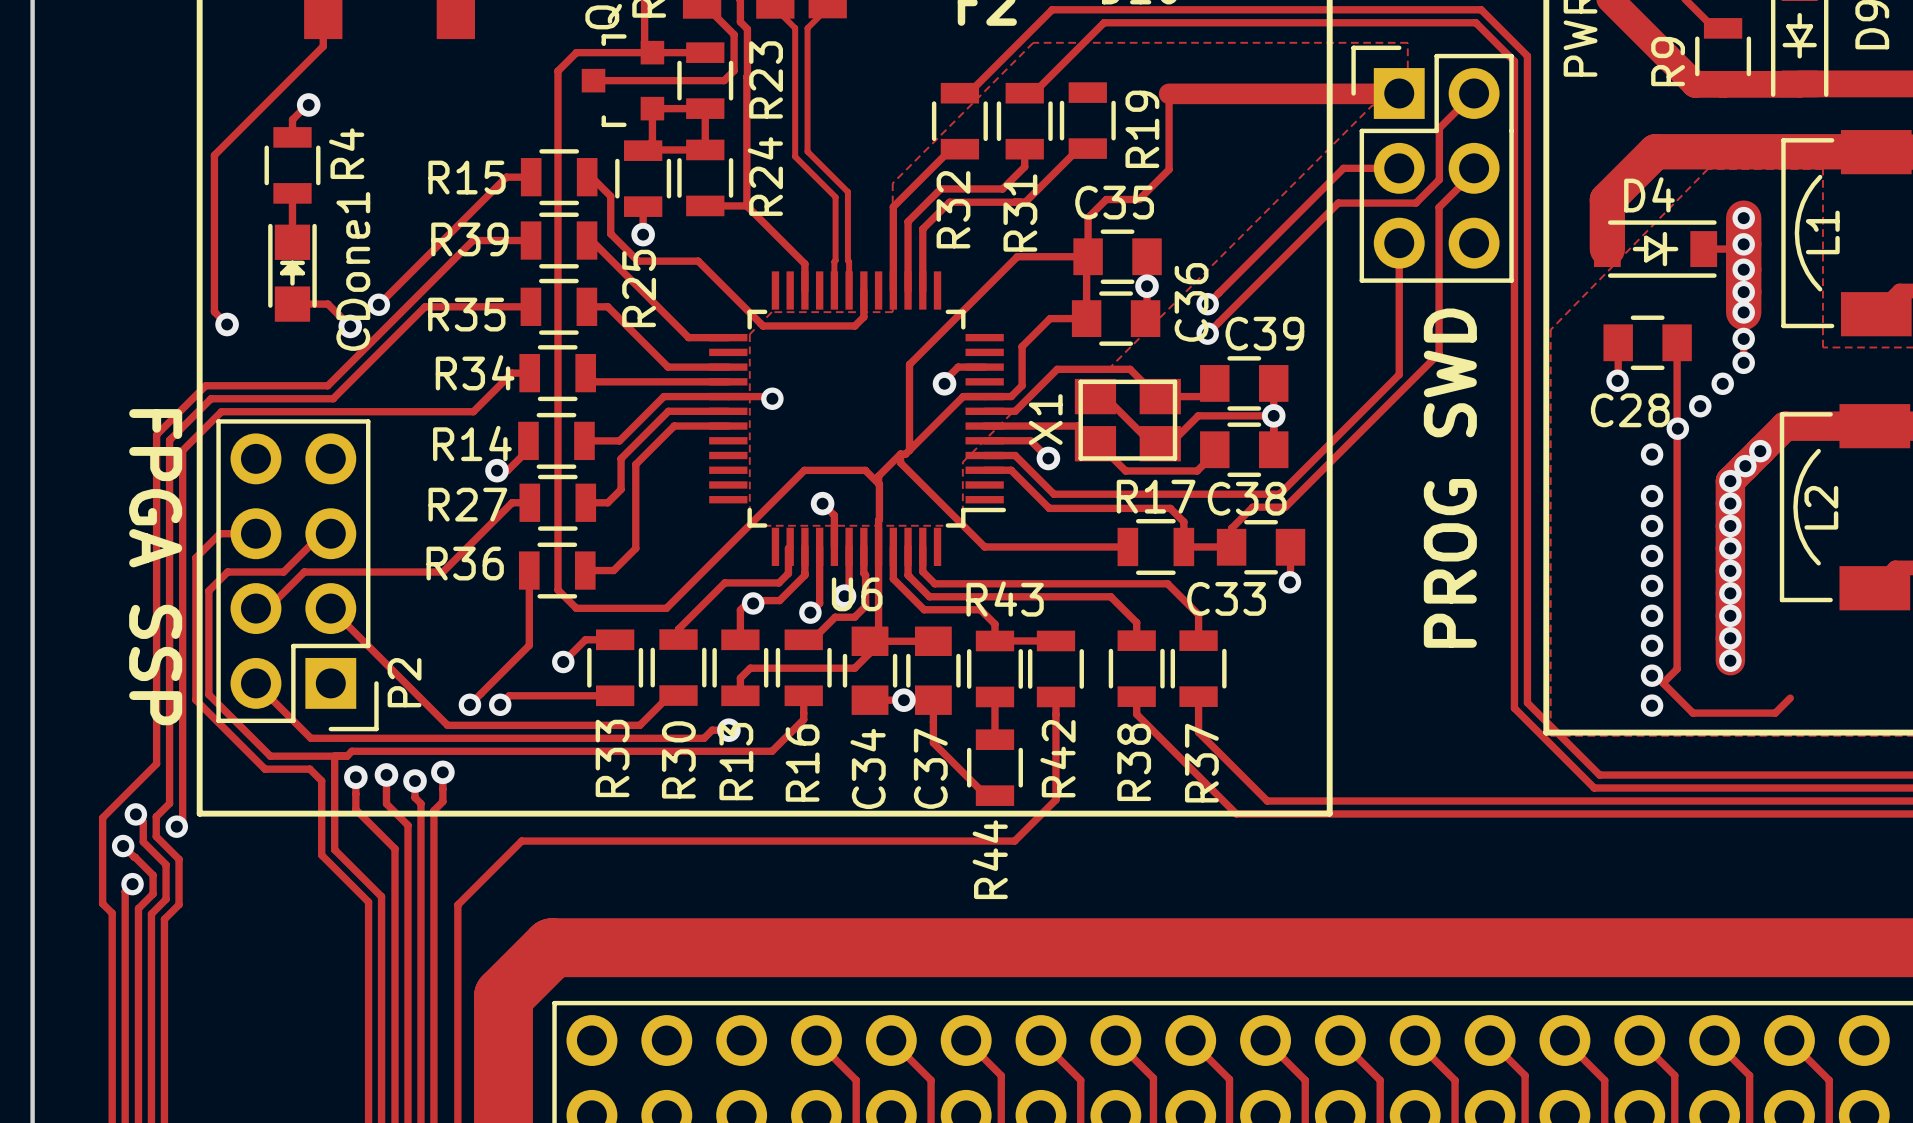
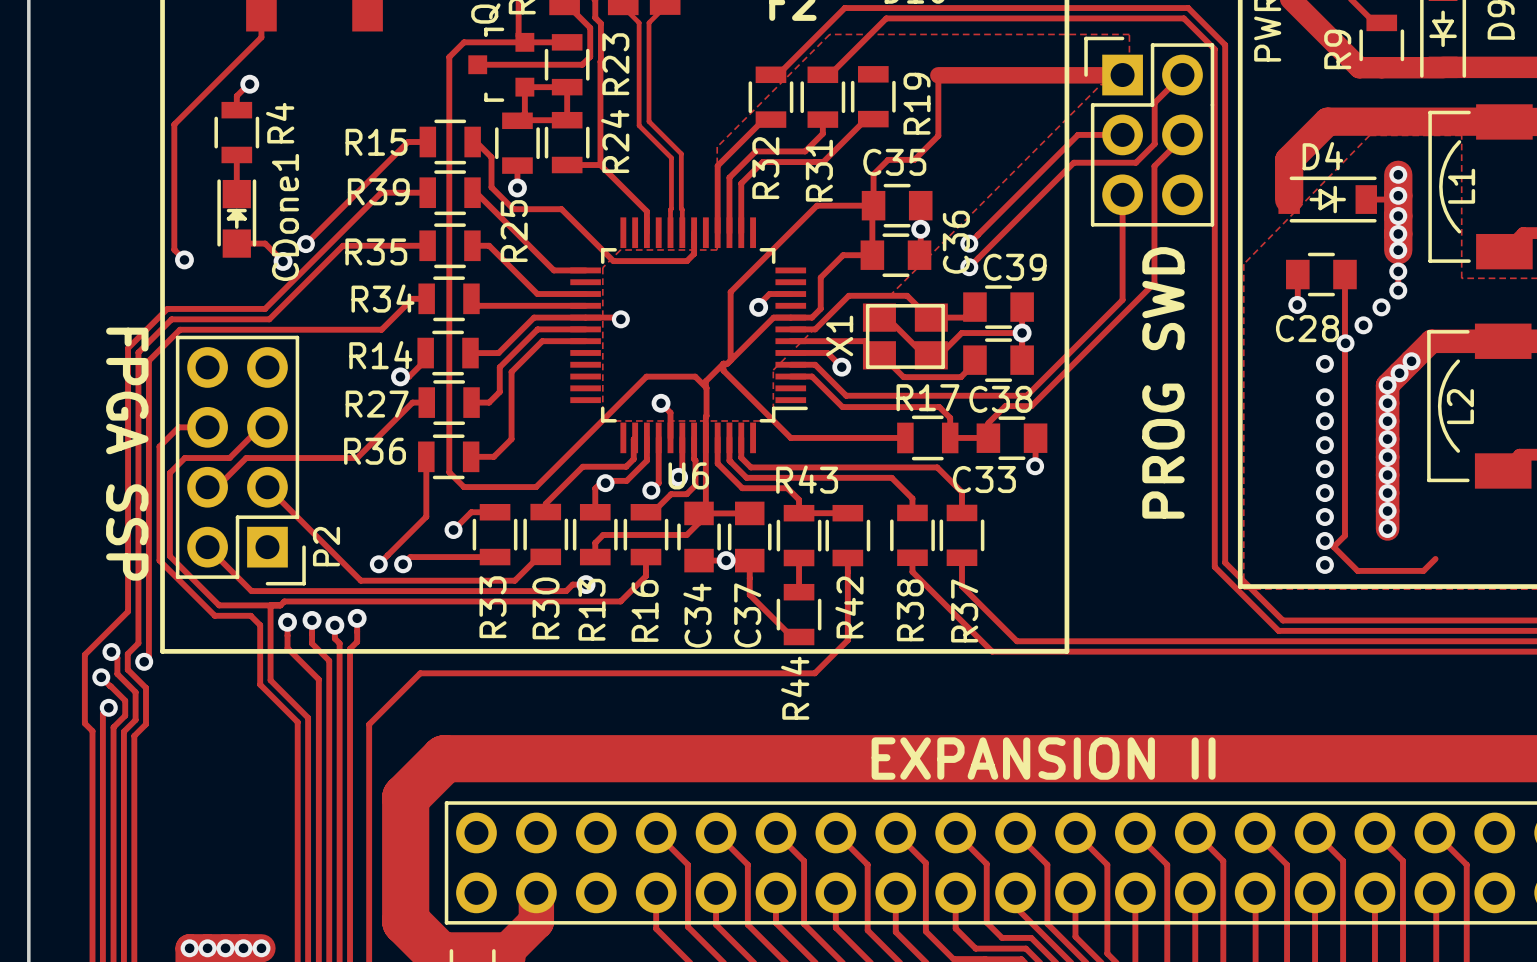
text: none -> EXPANSION II (1043, 758)

